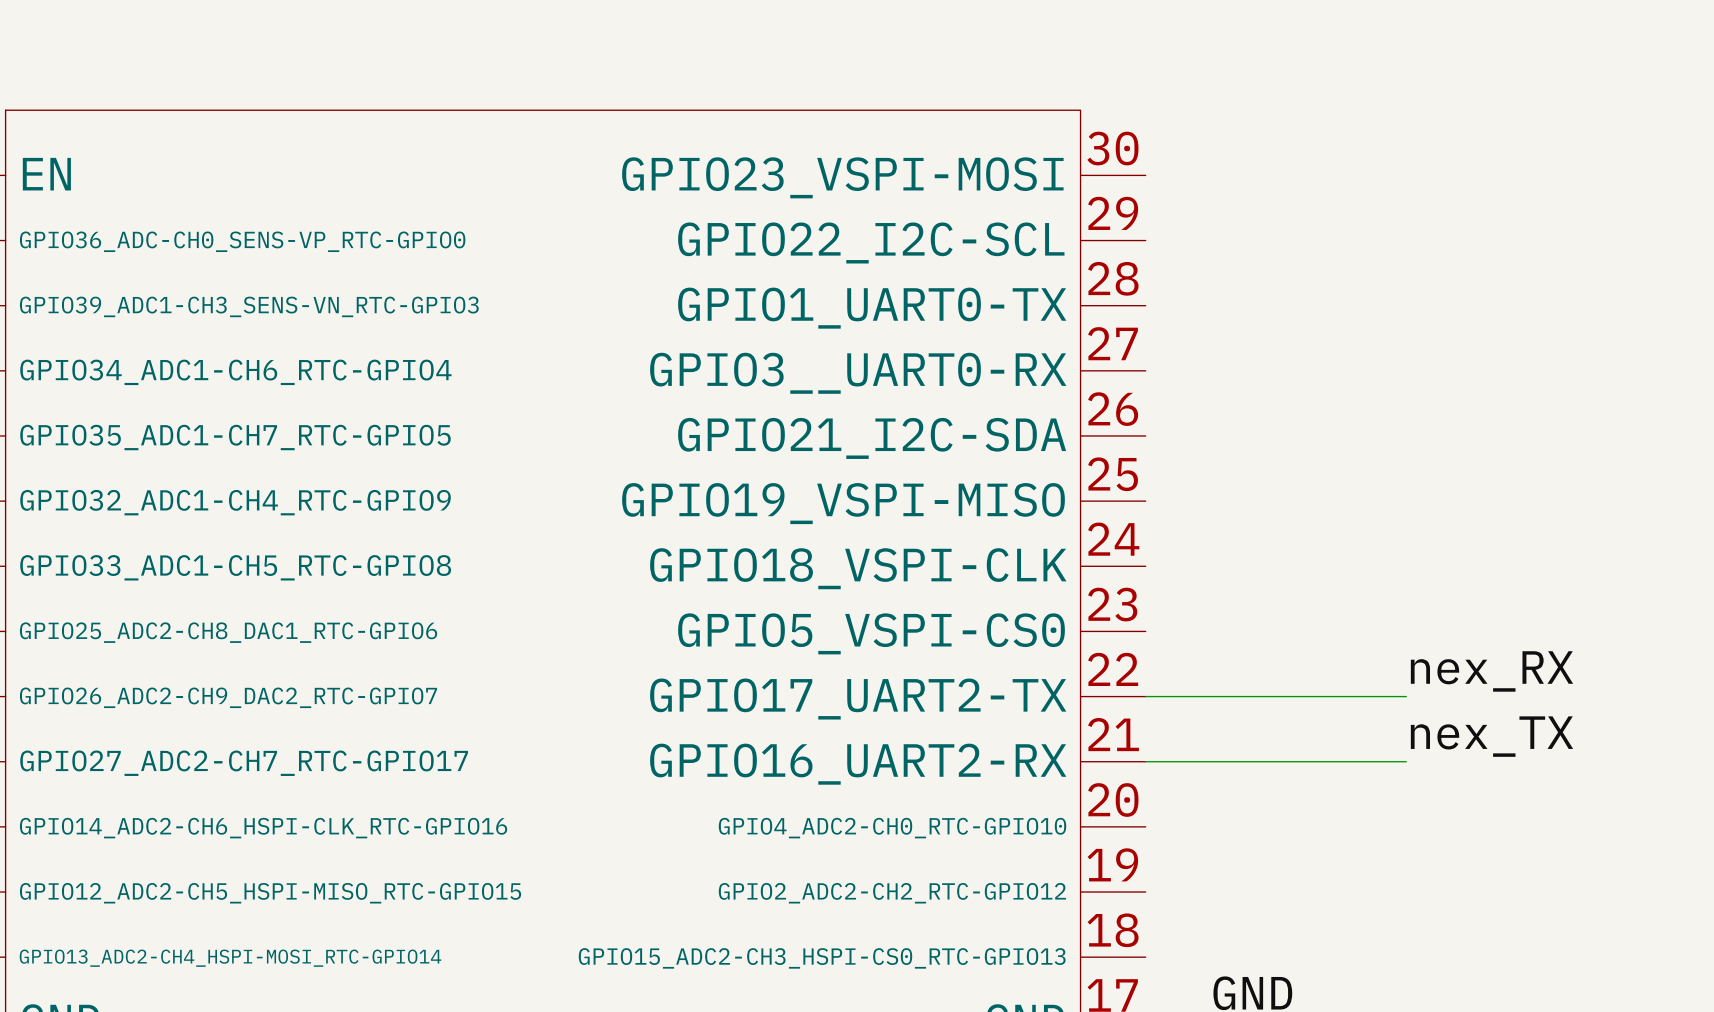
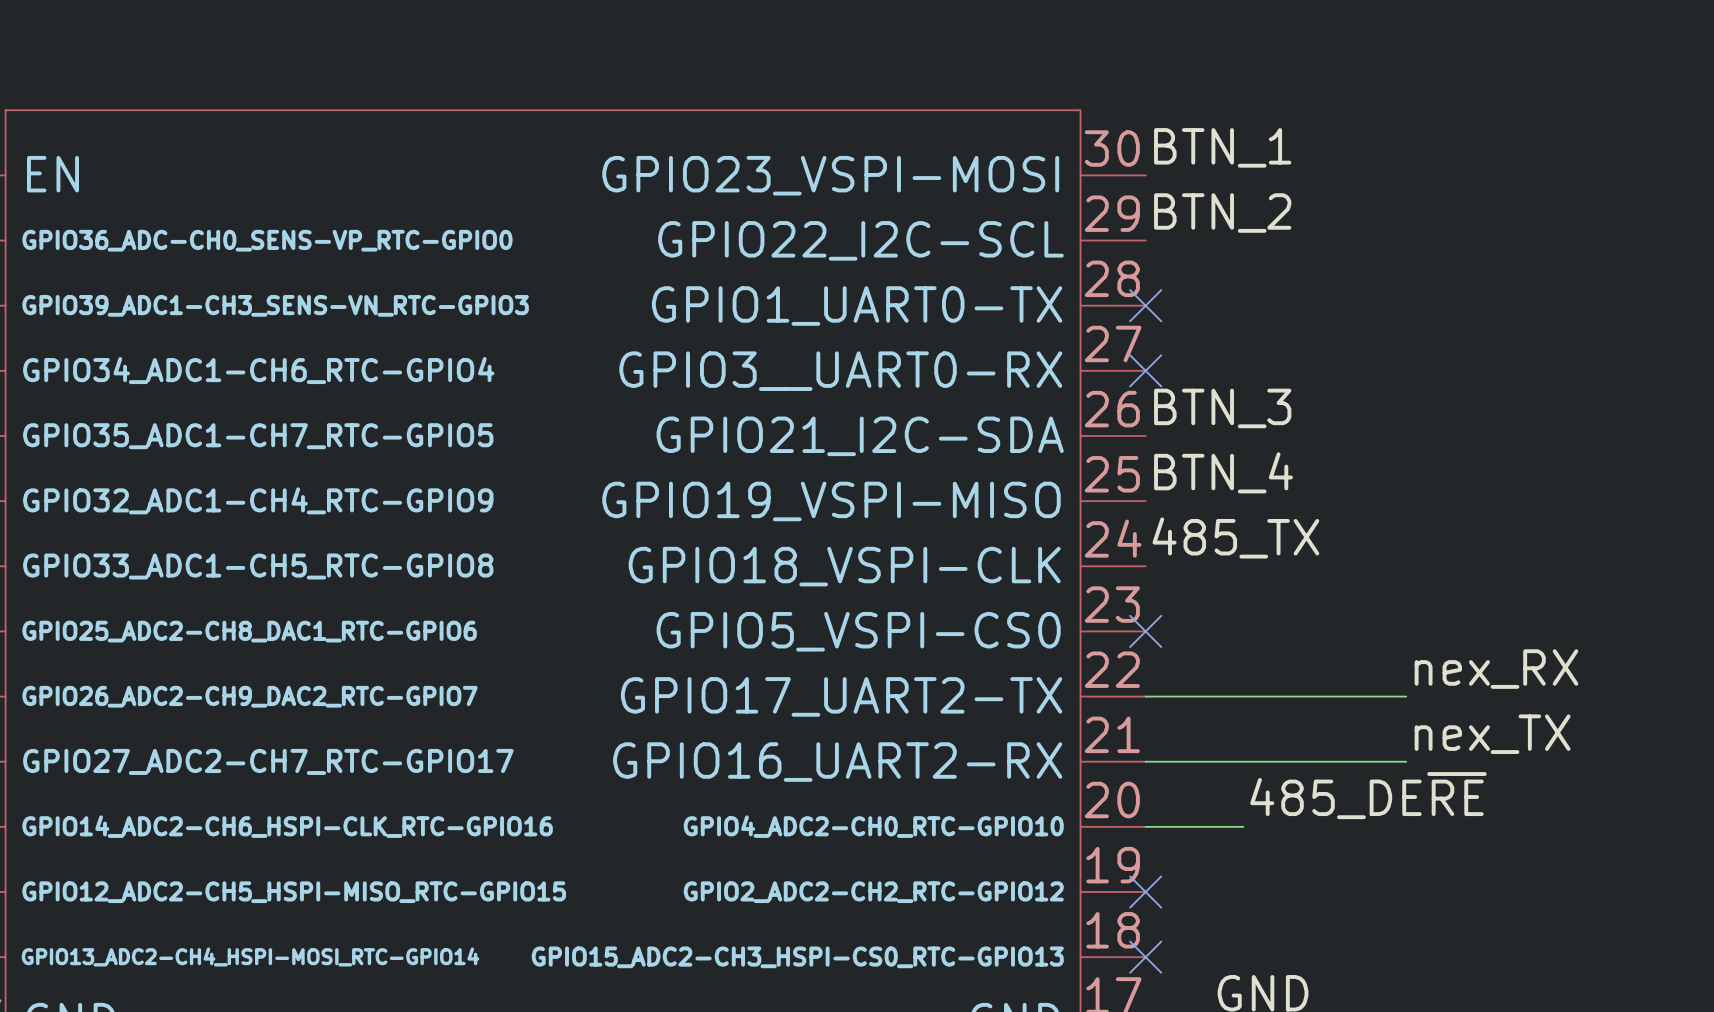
label: none -> BTN_1 (1222, 147)
label: none -> BTN_2 (1222, 213)
no-connect mark: none -> (1145, 305)
no-connect mark: none -> (1145, 370)
label: none -> BTN_3 (1222, 408)
label: none -> BTN_4 (1223, 472)
label: none -> 485_TX (1235, 537)
no-connect mark: none -> (1145, 631)
label: none -> 485_DE~{RE} (1368, 795)
wire: none -> (1145, 826) (1243, 826)
no-connect mark: none -> (1145, 892)
no-connect mark: none -> (1145, 957)

